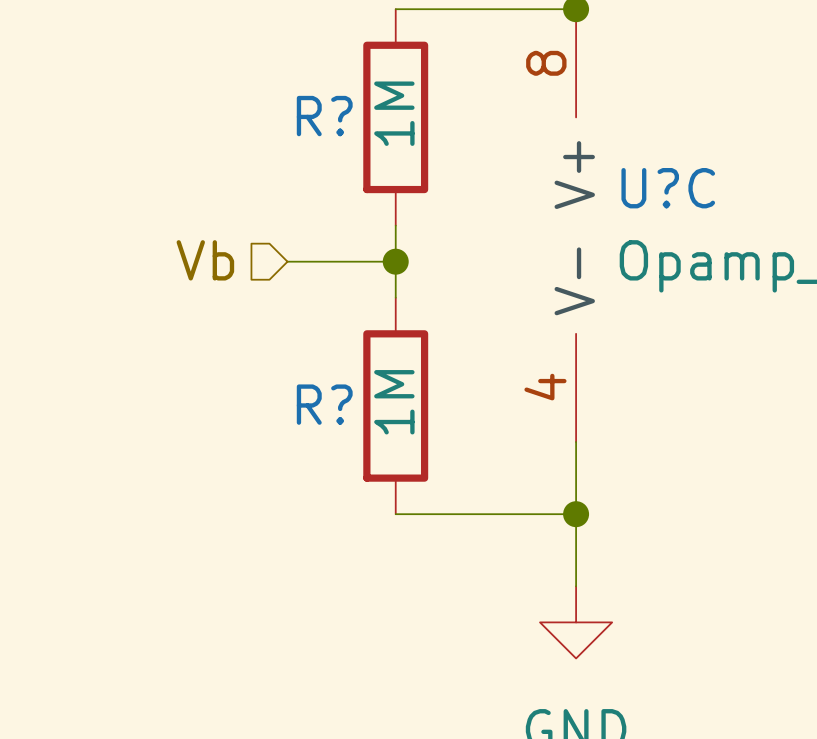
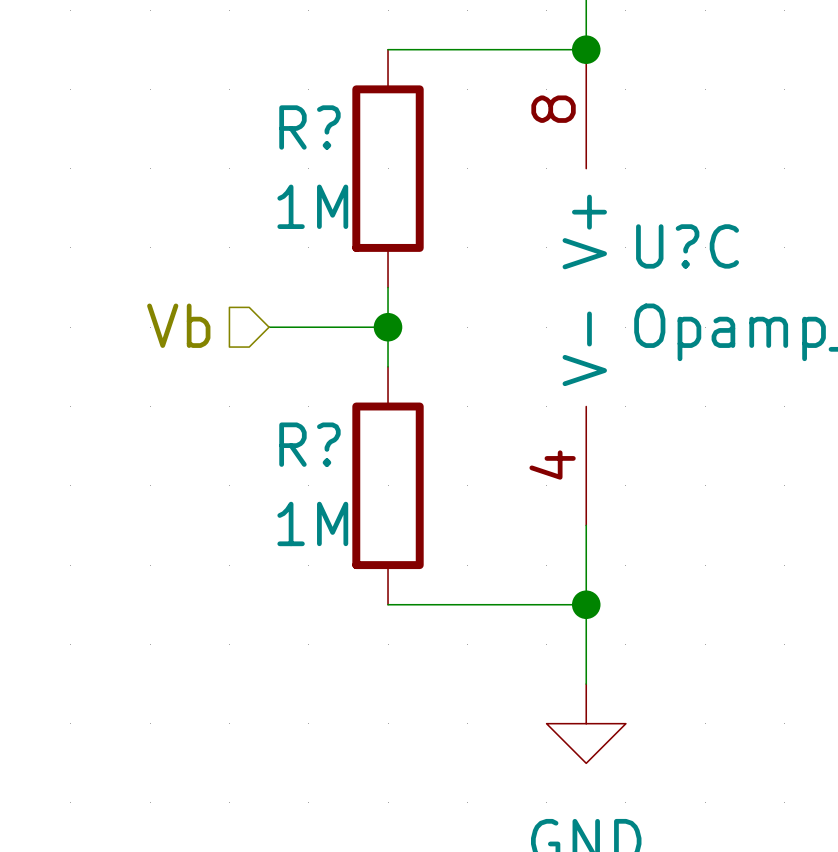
R? value rotation: 0° (394, 113) -> 90° clockwise (312, 206)
R? name position: R? (324, 116) -> R? (309, 127)
R? value rotation: 0° (394, 402) -> 90° clockwise (312, 523)
R? name position: R? (324, 404) -> R? (309, 444)

